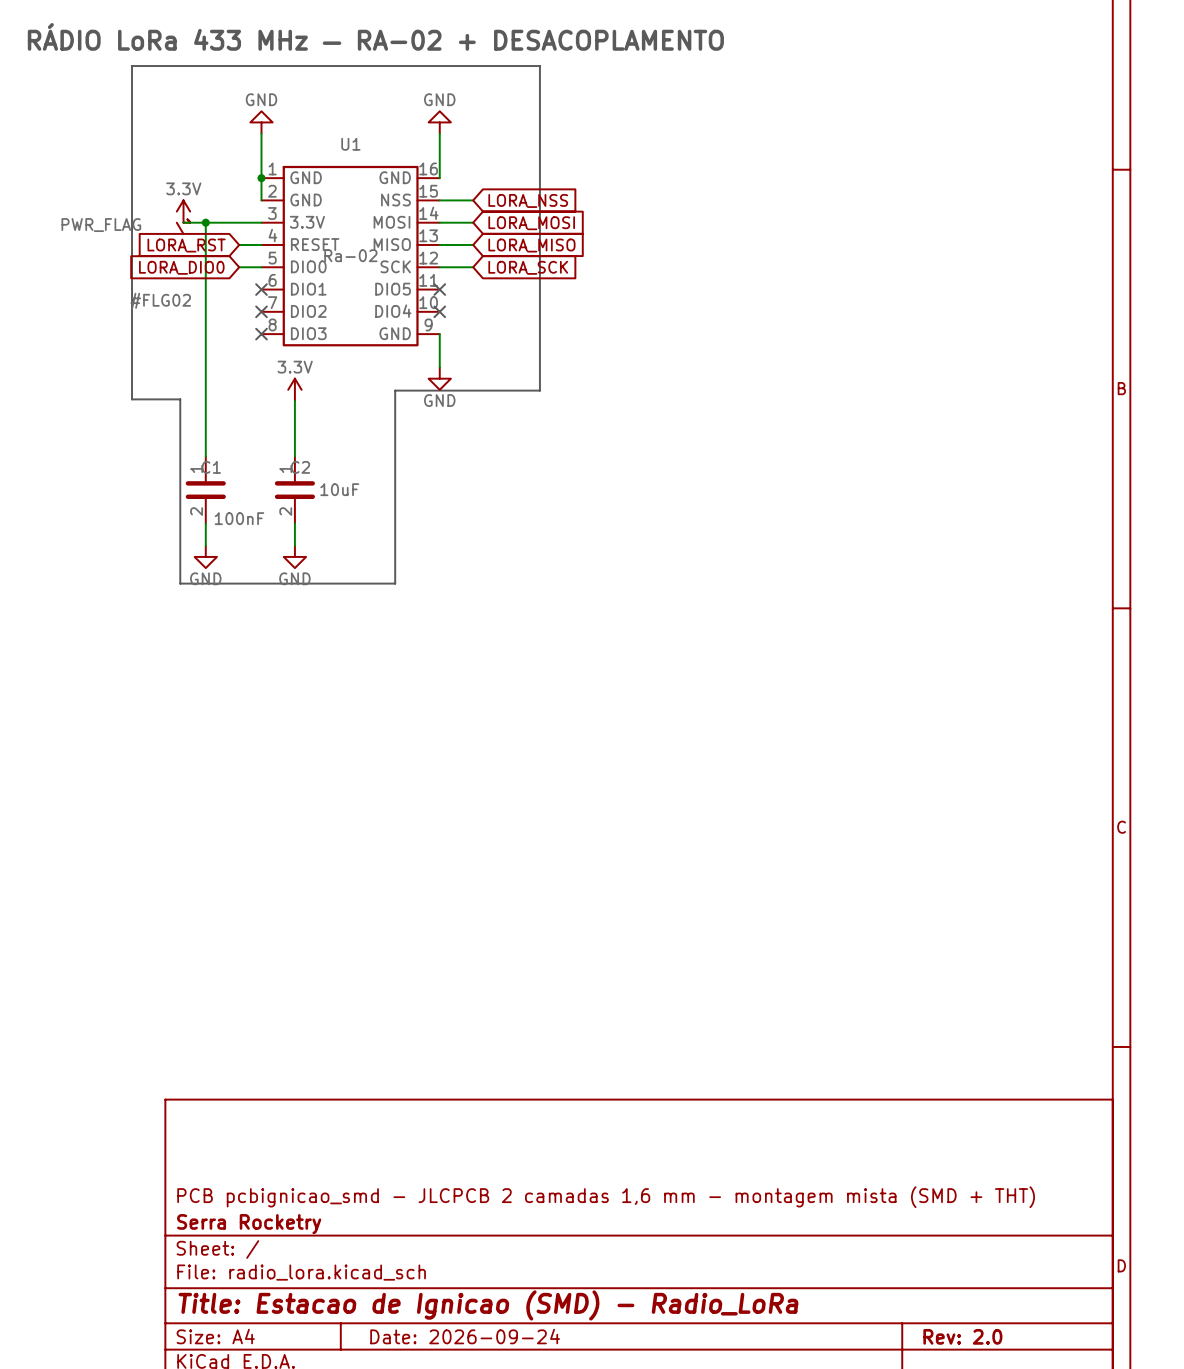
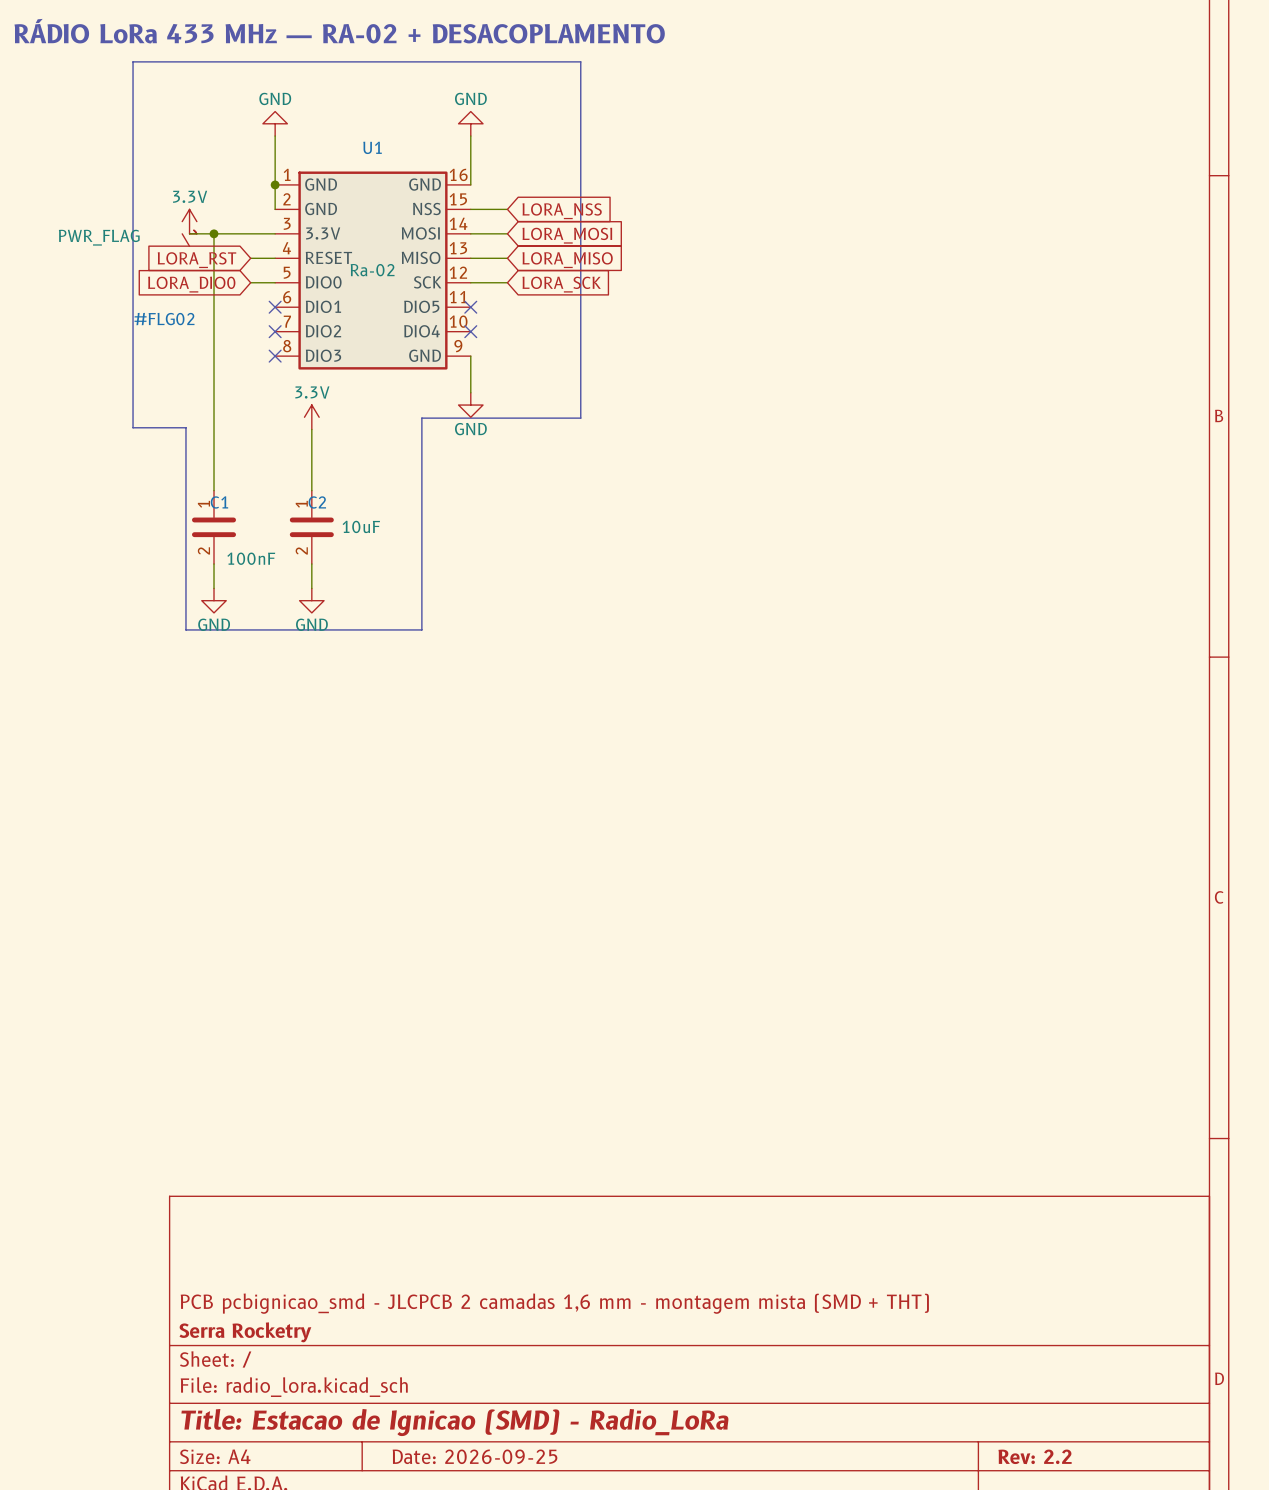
title block: Date: 2026-09-24 (465, 1336) -> Date: 2026-09-25 (475, 1456)
title block: Rev: 2.0 (962, 1336) -> Rev: 2.2 (1035, 1456)

